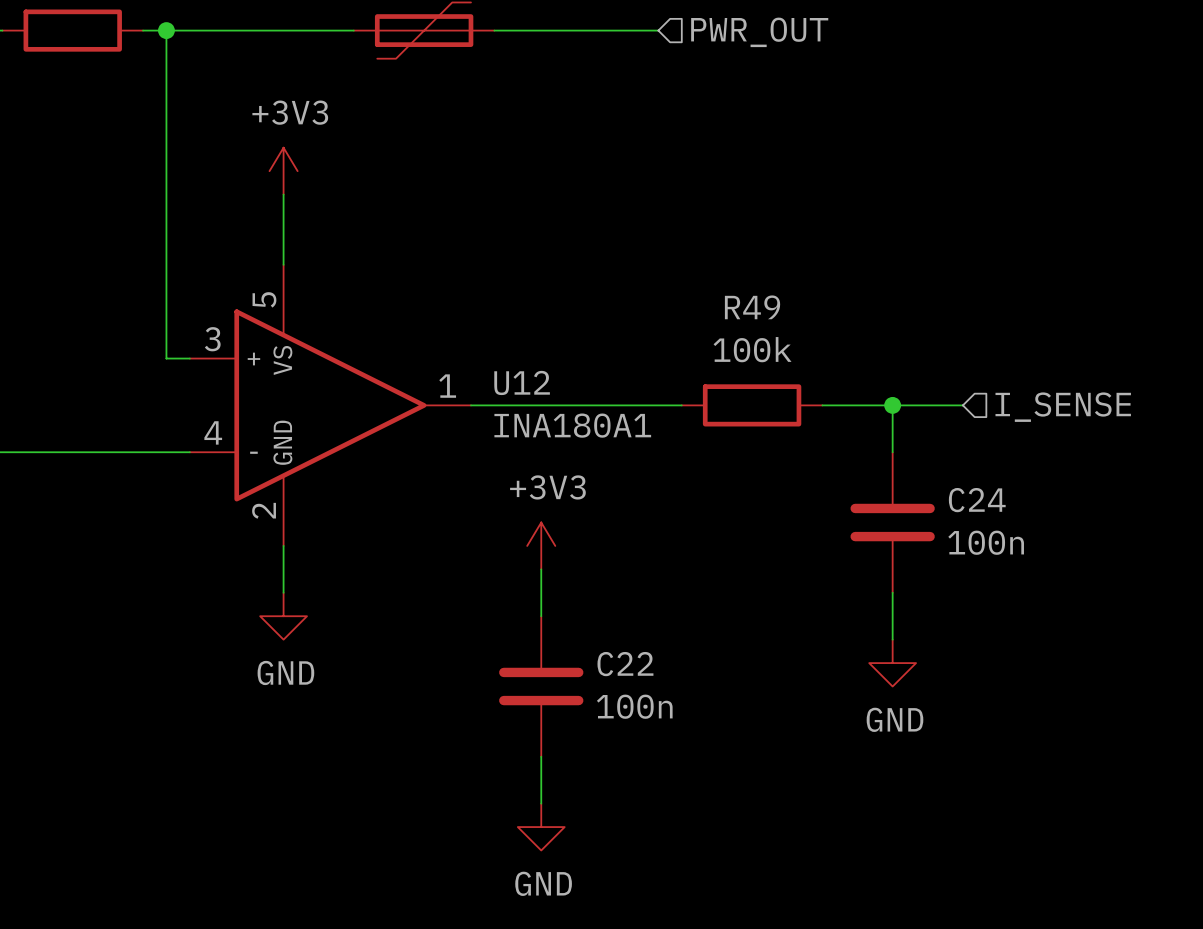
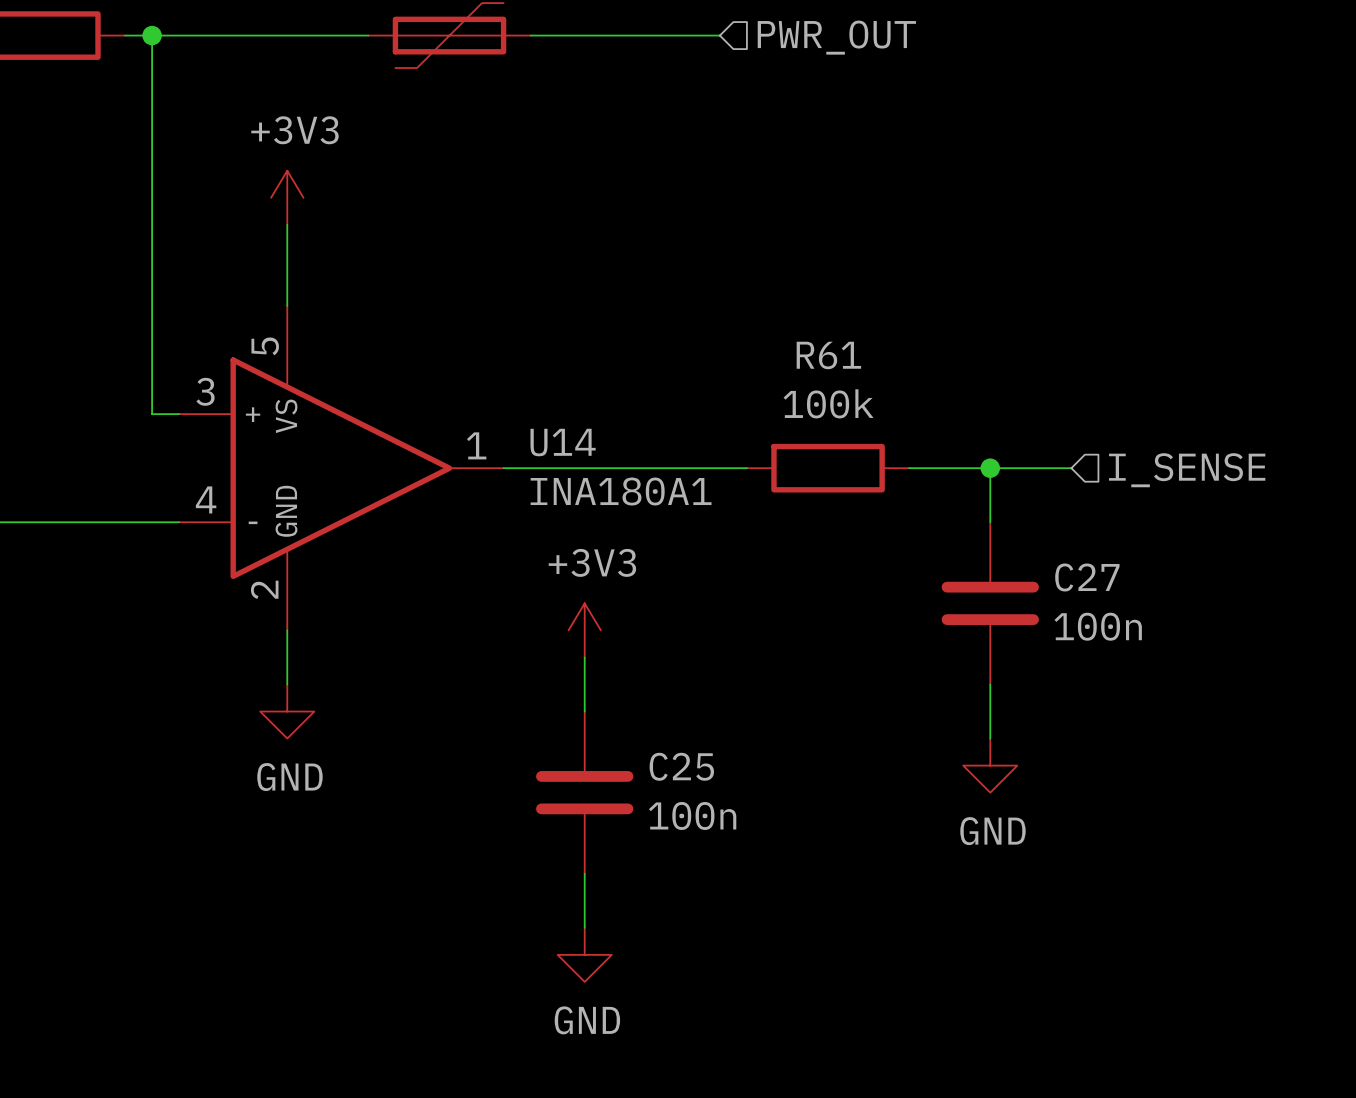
R49 name: R49 (752, 307) -> R61 (828, 355)
U12 name: U12 (522, 382) -> U14 (563, 442)
C24 name: C24 (977, 500) -> C27 (1087, 577)
C22 name: C22 (625, 664) -> C25 (681, 766)

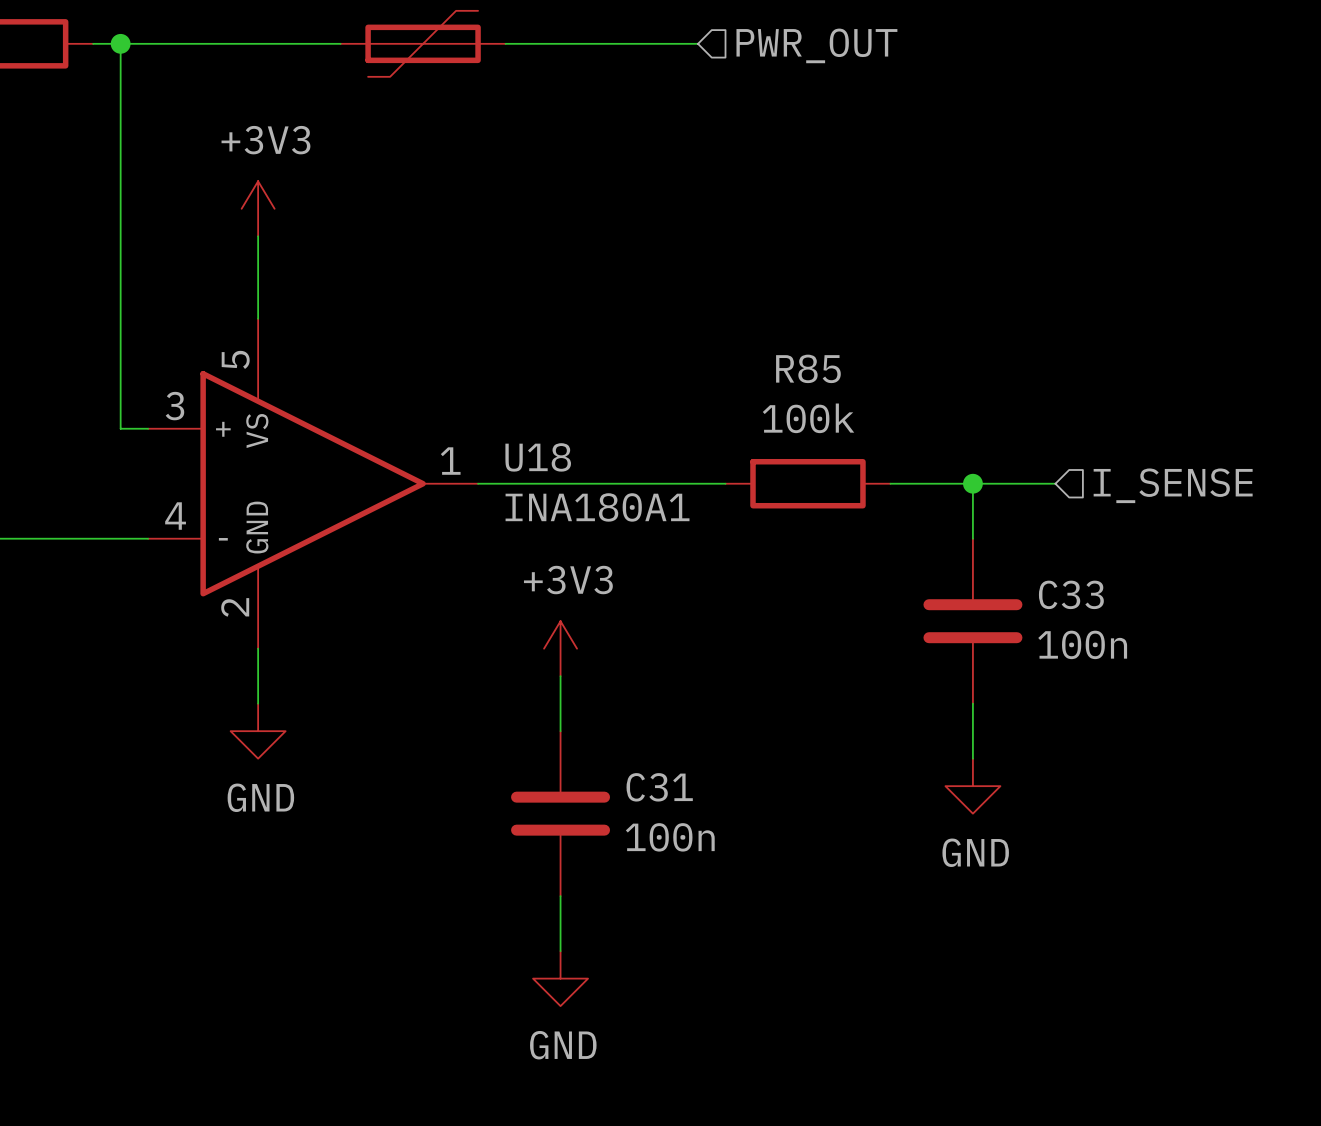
R61 name: R61 (828, 355) -> R85 (808, 368)
U14 name: U14 (563, 442) -> U18 (538, 457)
C27 name: C27 (1087, 577) -> C33 (1071, 594)
C25 name: C25 (681, 766) -> C31 (659, 787)

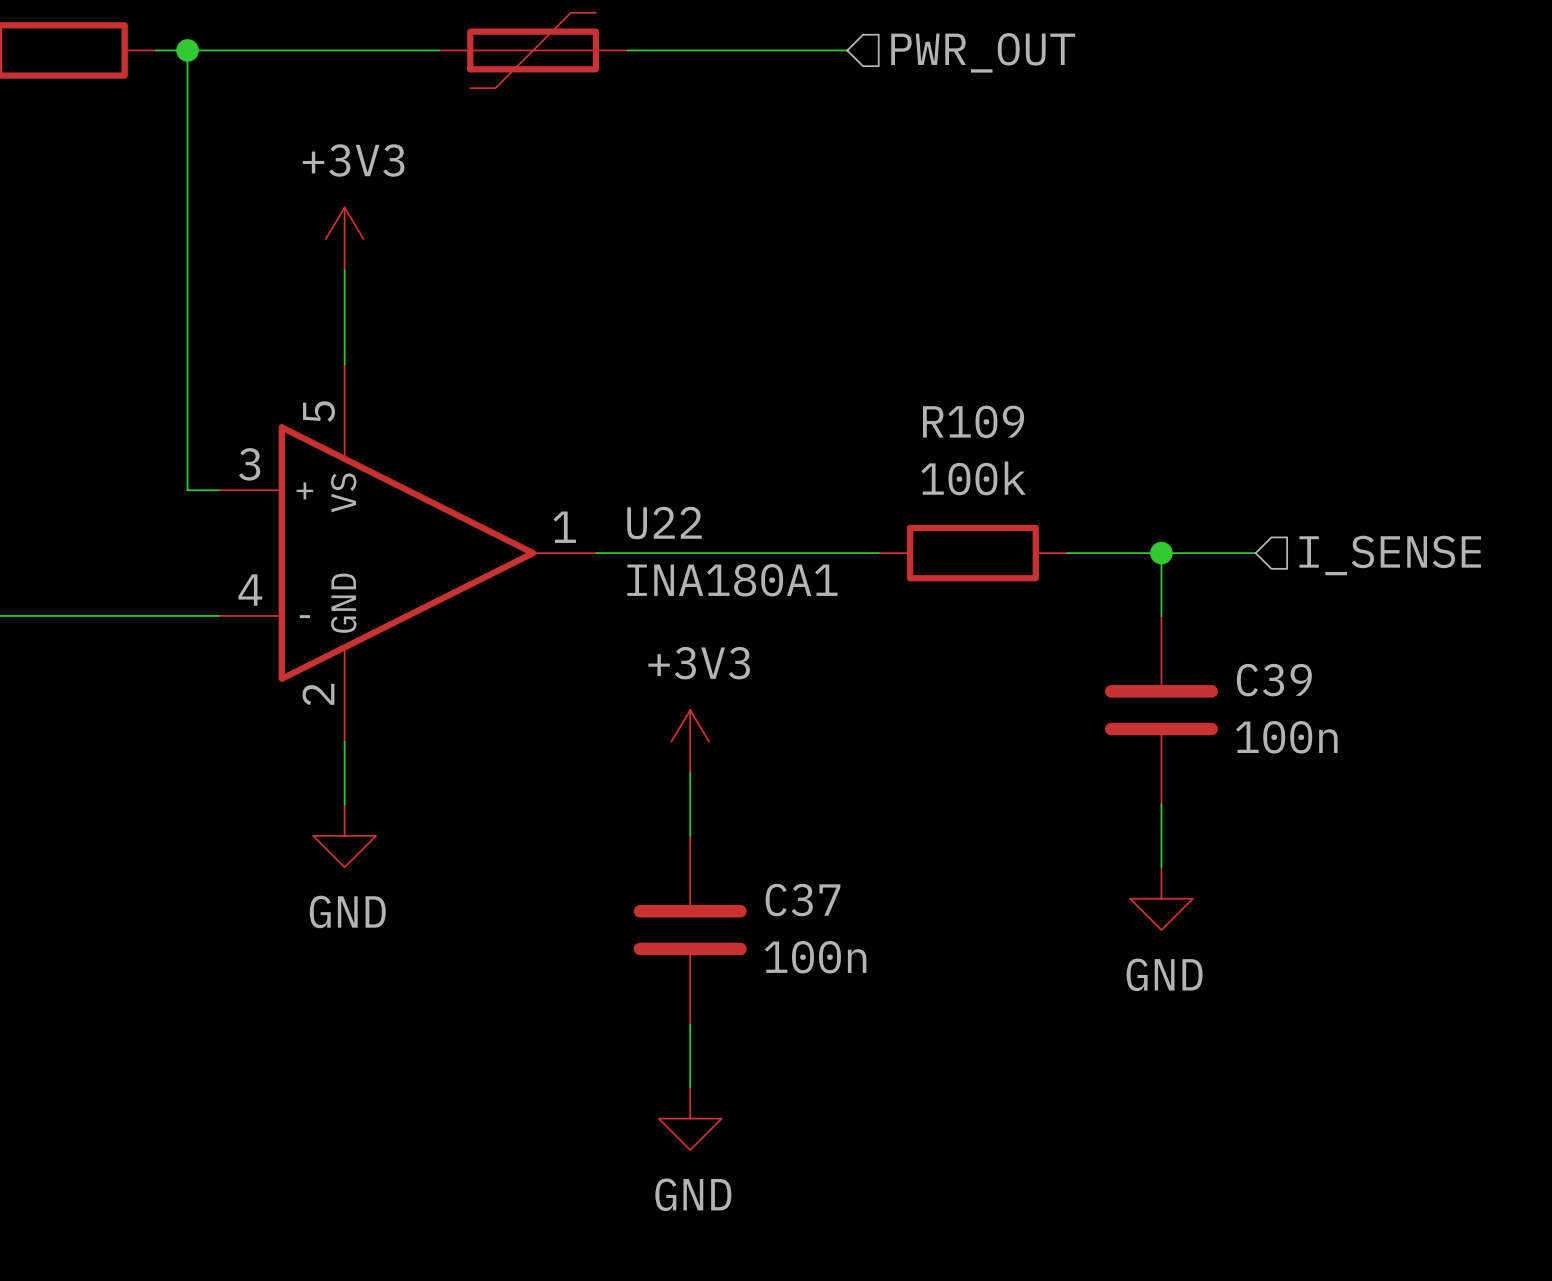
R85 name: R85 (808, 368) -> R109 (973, 421)
U18 name: U18 (538, 457) -> U22 (664, 523)
C33 name: C33 (1071, 594) -> C39 (1274, 680)
C31 name: C31 (659, 787) -> C37 (803, 900)

